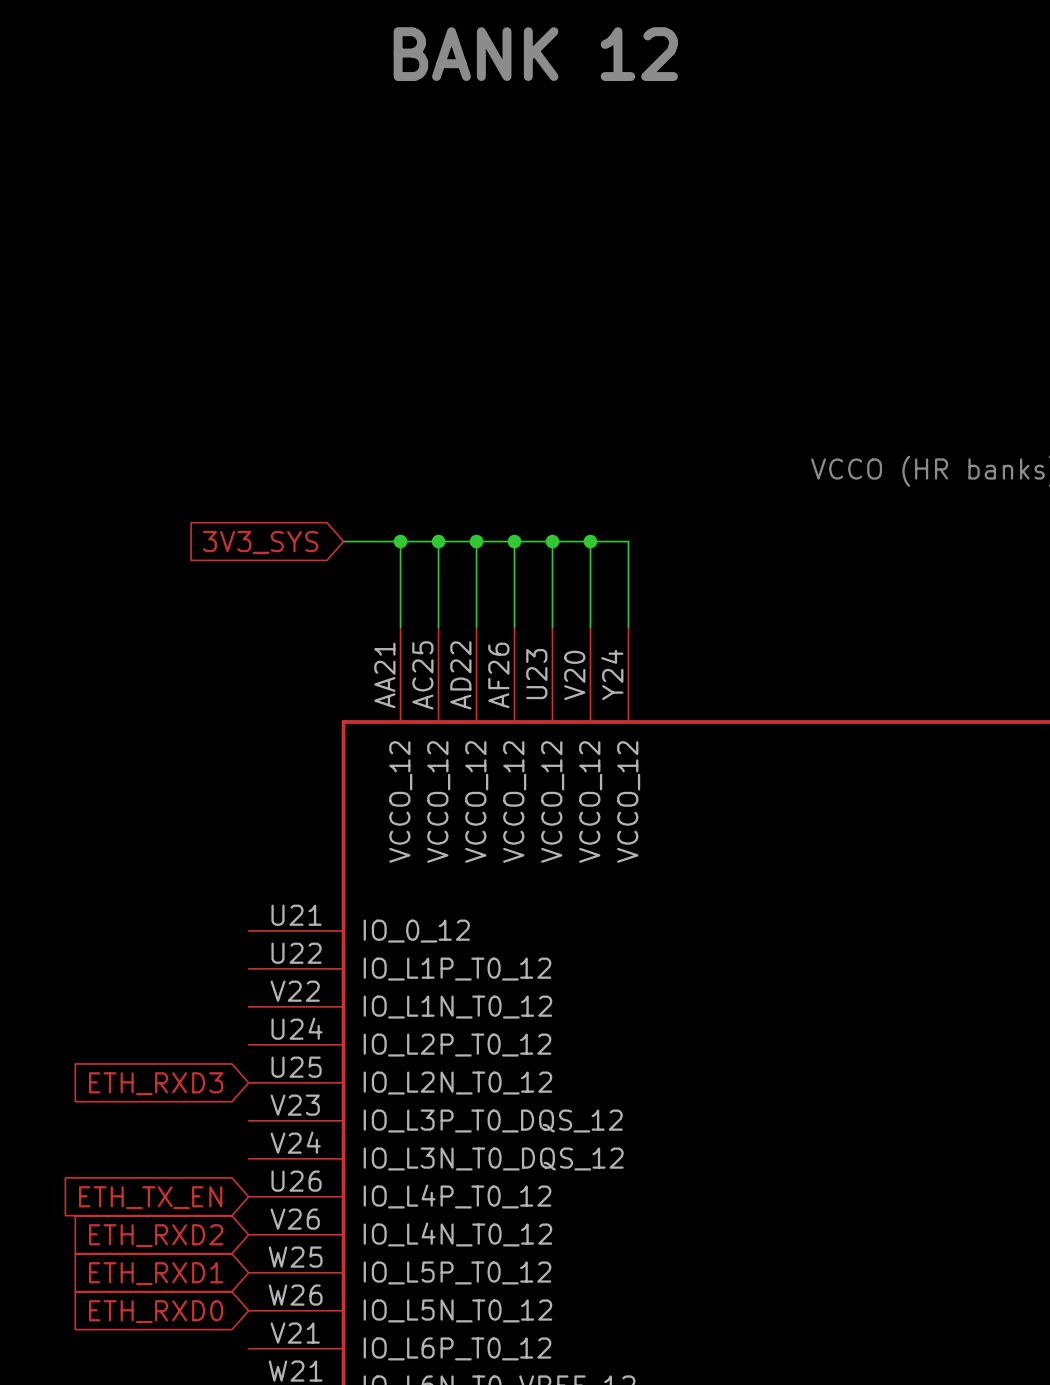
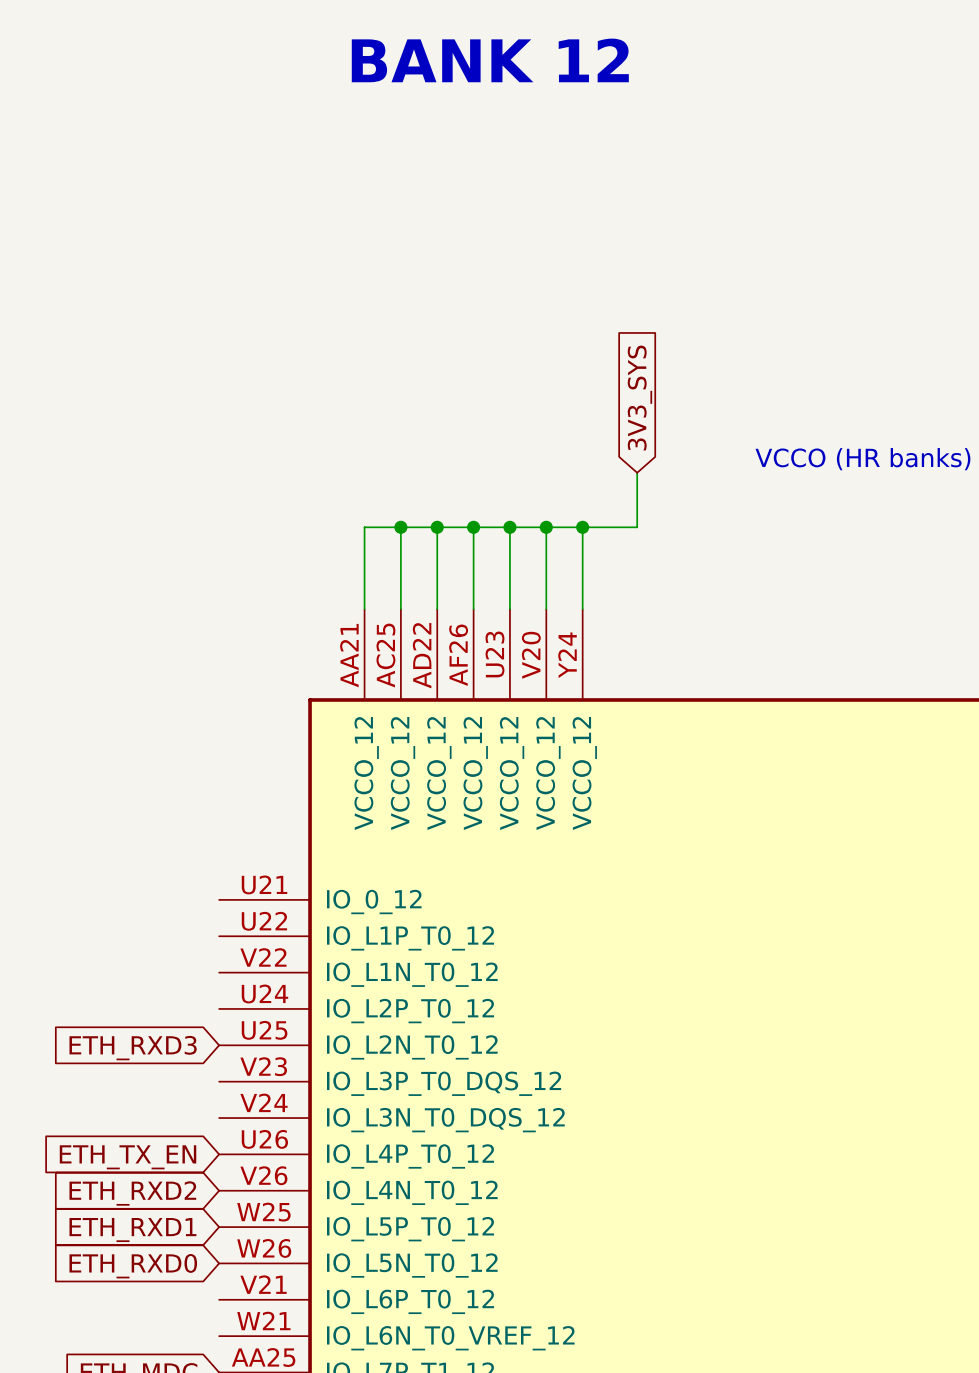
wire: none -> (637, 472) (637, 527) (582, 527)
wire: (343, 541) (400, 541) -> none
junction: (400, 541) -> none
junction: none -> (582, 527)
global label rotation: 0° (260, 542) -> 90° clockwise (639, 398)
global label position: 3V3_SYS (260, 542) -> 3V3_SYS (639, 398)

